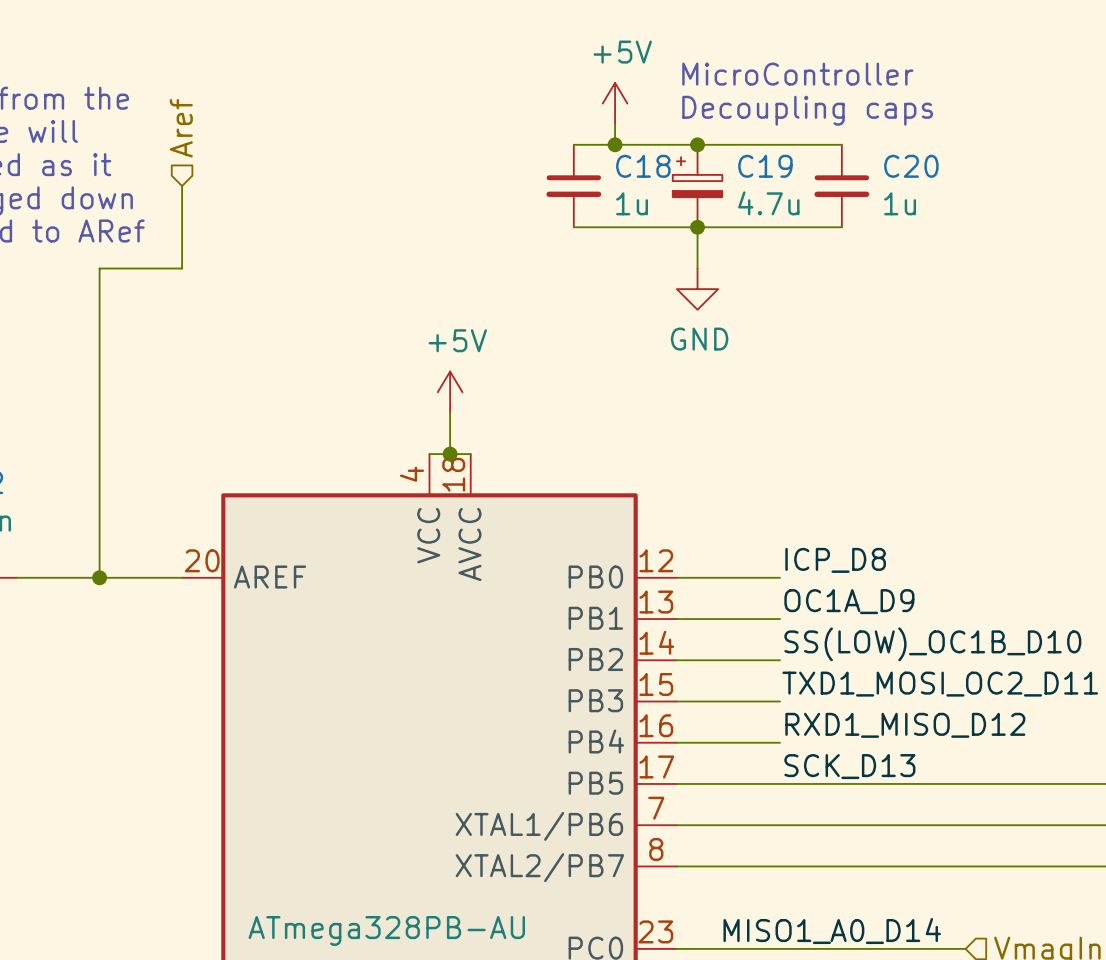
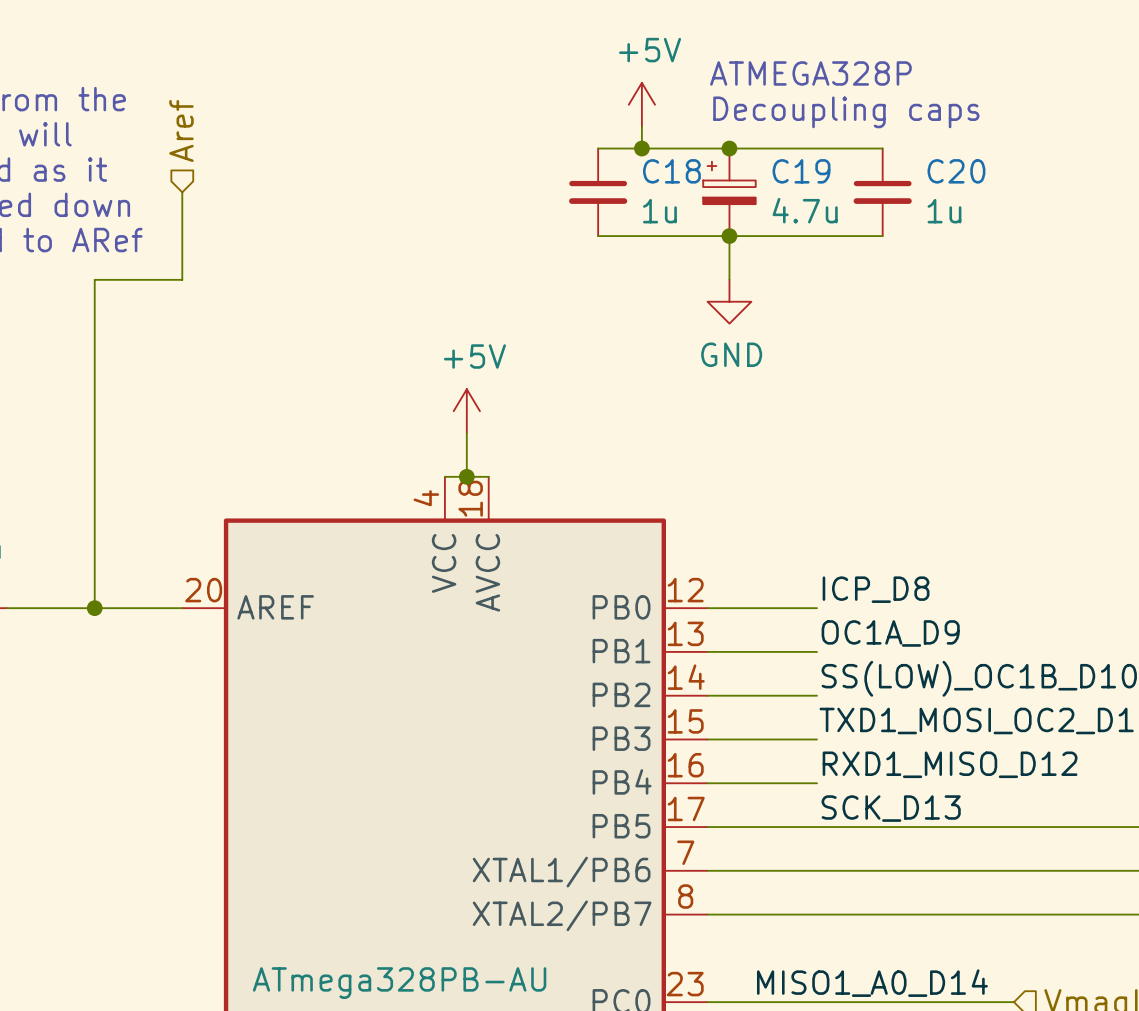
text: MicroController (797, 74) -> ATMEGA328P (810, 73)

